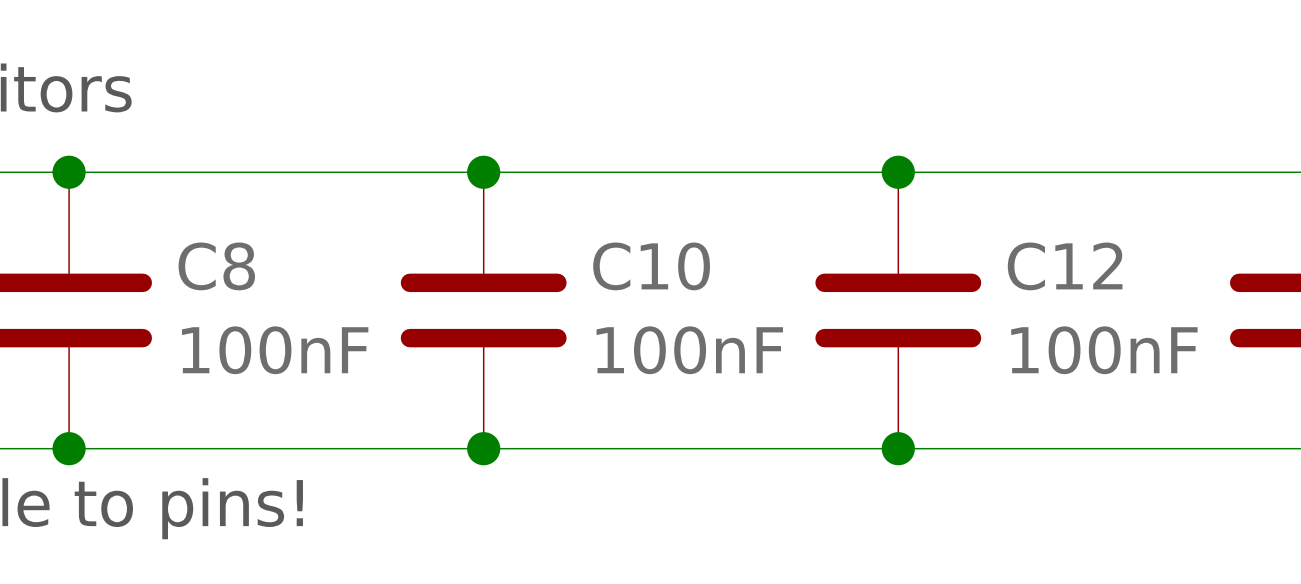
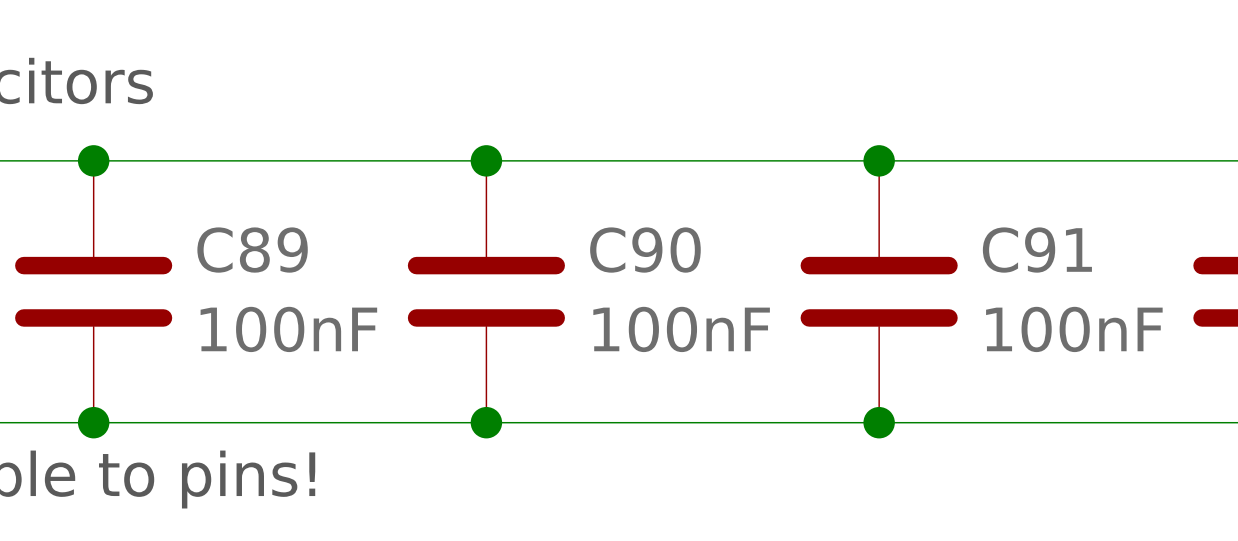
C8 name: C8 (216, 266) -> C89 (252, 250)
C10 name: C10 (651, 266) -> C90 (645, 250)
C12 name: C12 (1065, 266) -> C91 (1037, 250)

